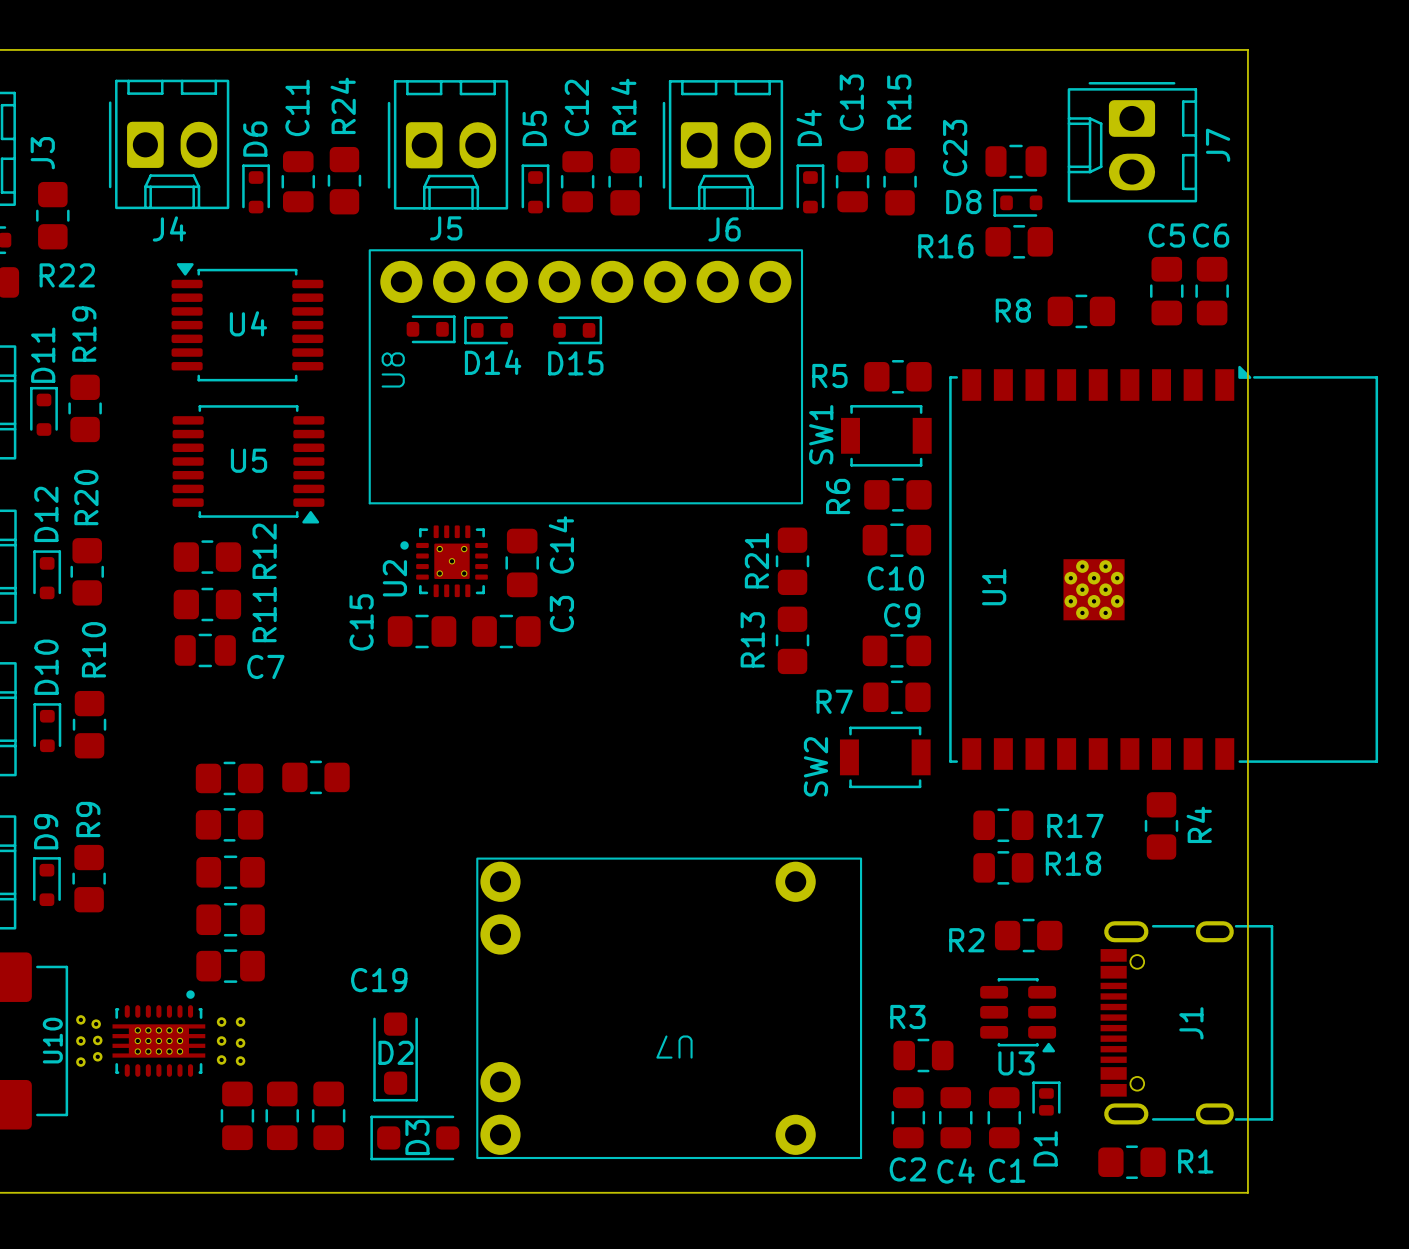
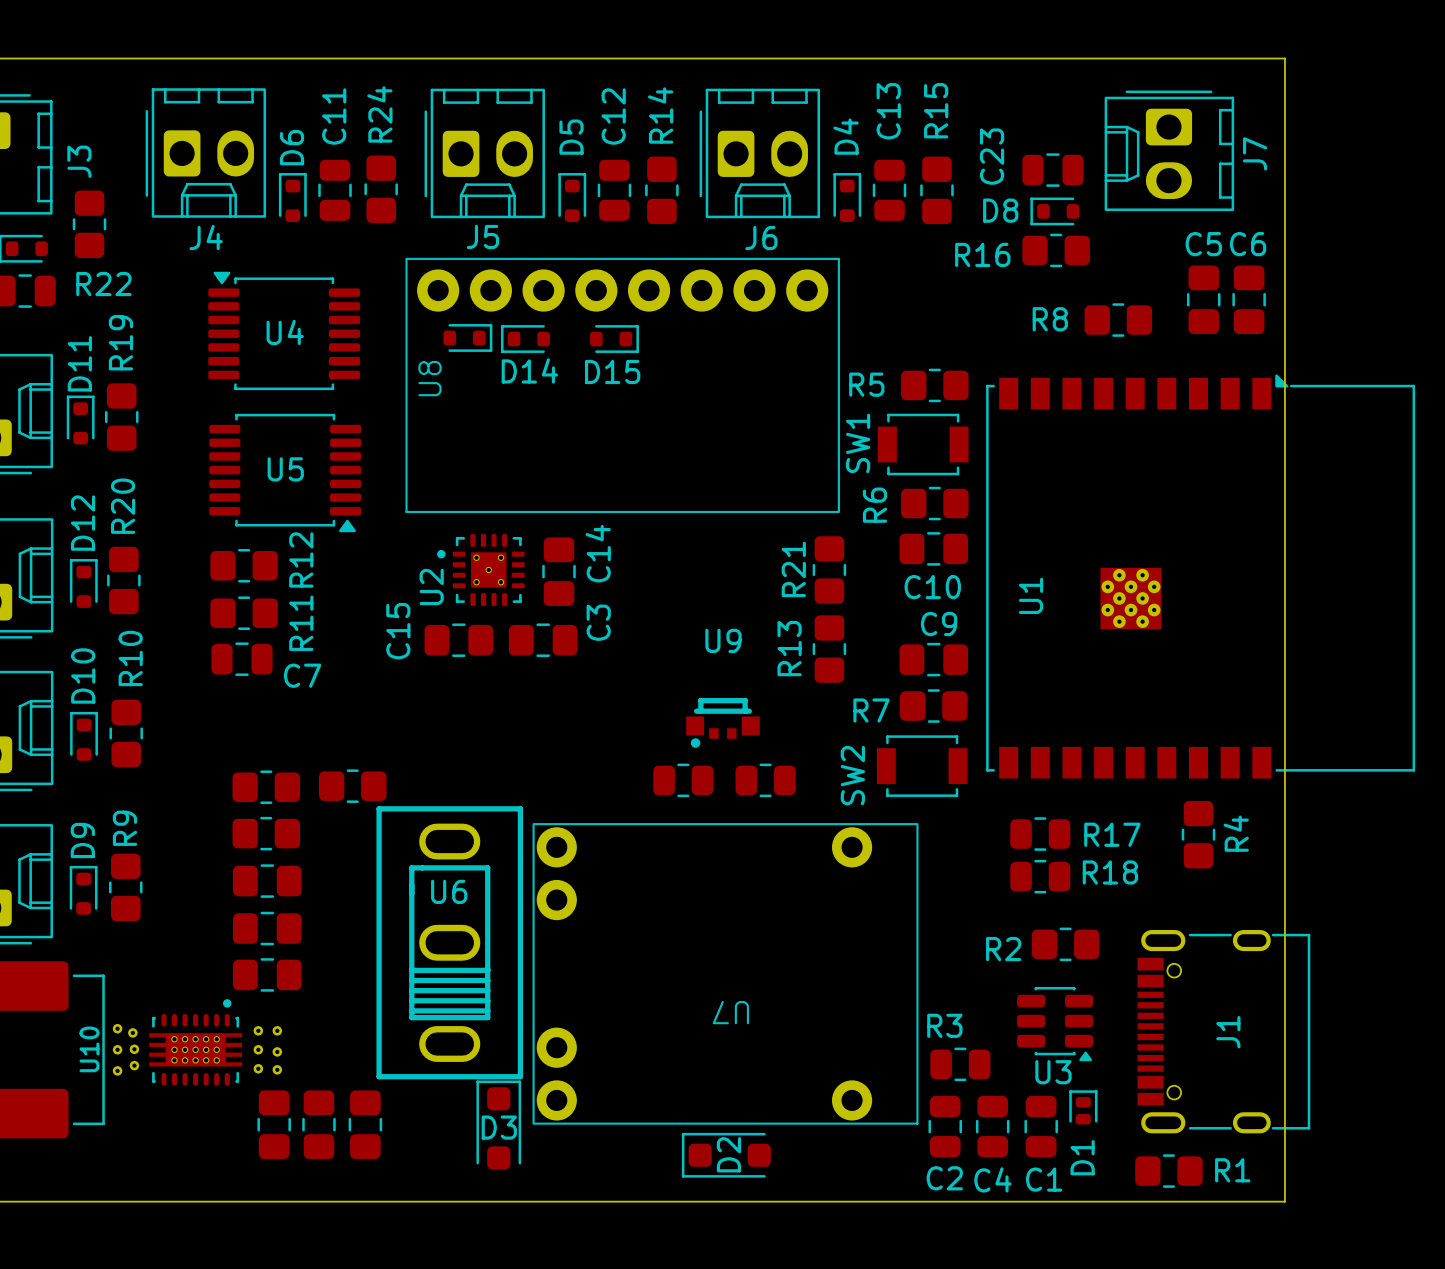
U9: none -> (722, 722)
part: none -> (683, 780)
part: none -> (765, 780)
U6: none -> (449, 942)
C19 name: C19 (379, 980) -> none
U7 position: (669, 1008) -> (725, 973)
D2 rotation: 0° (395, 1057) -> 90° clockwise (726, 1155)
D2 position: (395, 1057) -> (726, 1155)
D3 rotation: 0° (414, 1137) -> 90° clockwise (498, 1125)

